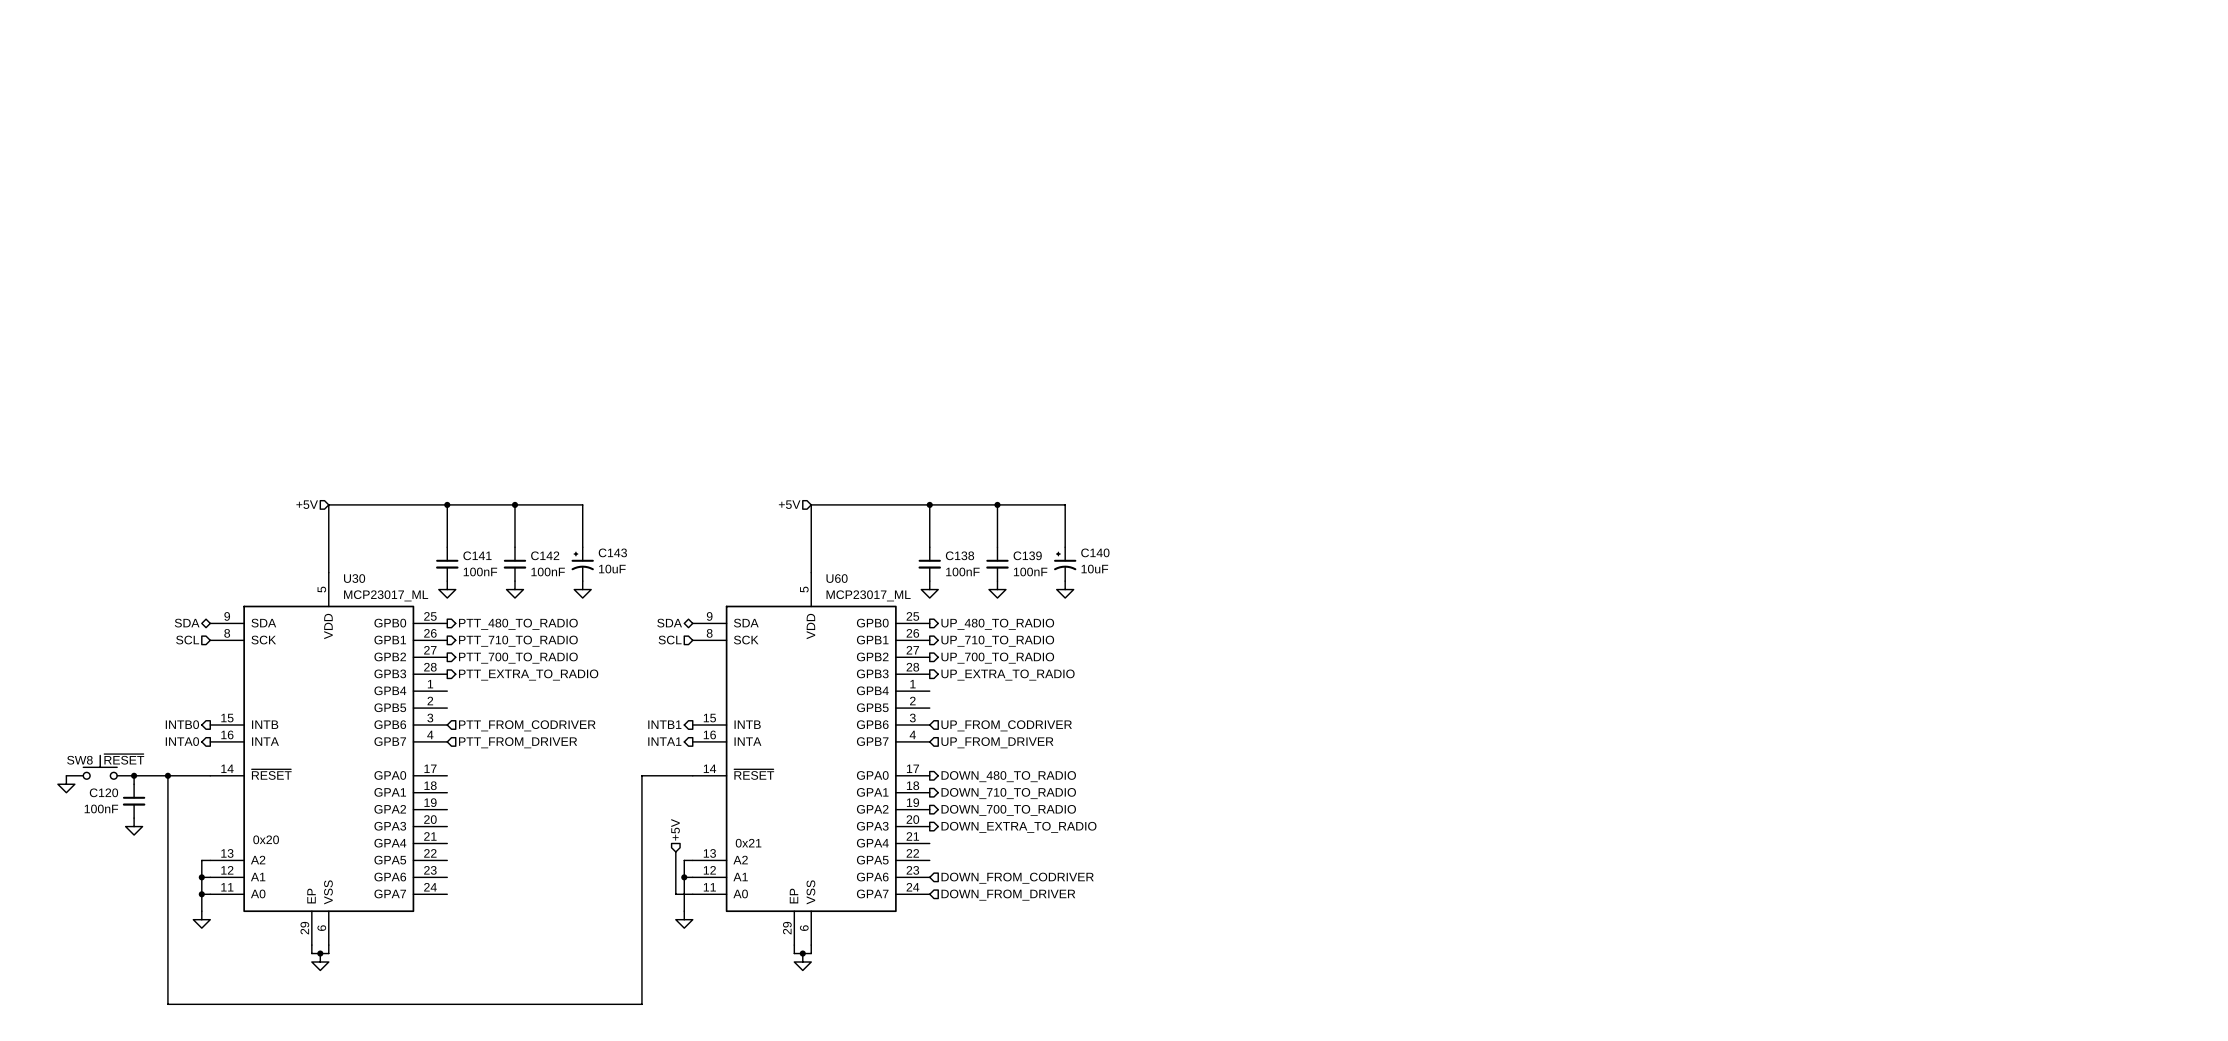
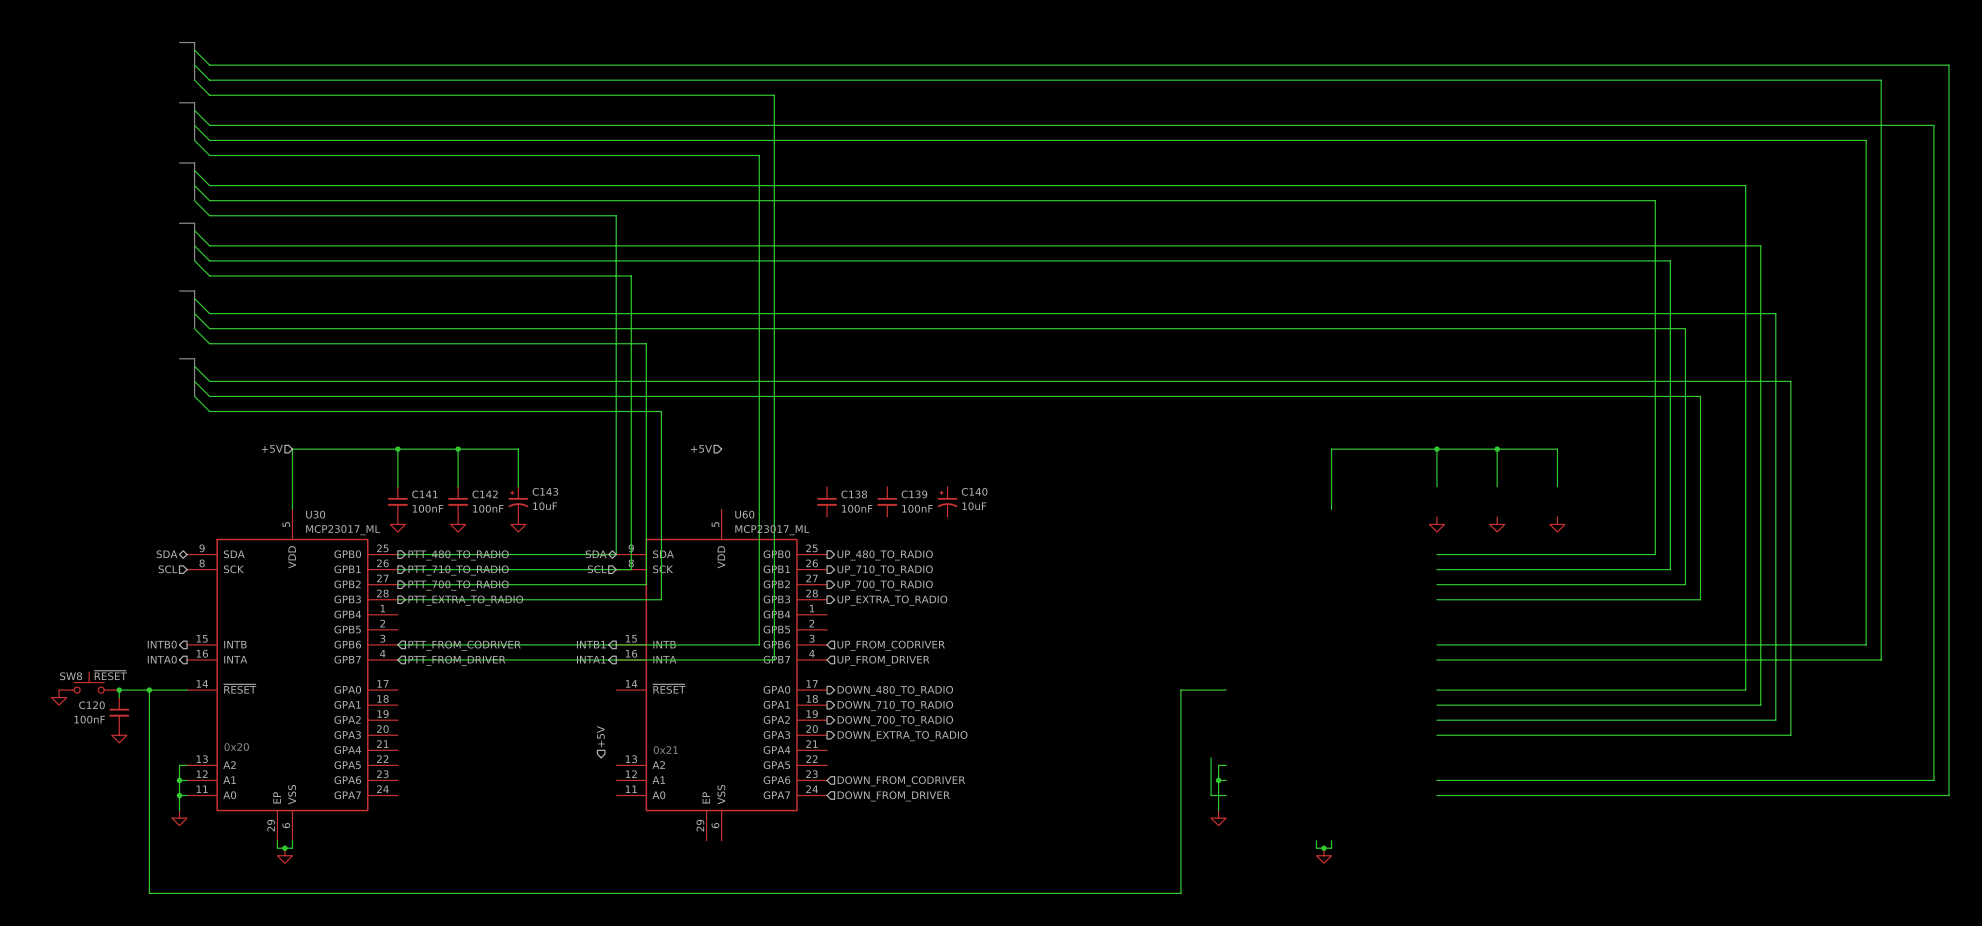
bus: none -> (179, 42) (194, 42) (194, 80)
wire: none -> (194, 50) (209, 65) (1948, 65) (1948, 795) (1436, 795)
wire: none -> (194, 65) (209, 80) (1881, 80) (1881, 659) (1436, 659)
wire: none -> (194, 80) (209, 95) (774, 95) (774, 659) (397, 659)
bus: none -> (179, 102) (194, 102) (194, 140)
wire: none -> (194, 110) (209, 125) (1933, 125) (1933, 780) (1436, 780)
wire: none -> (194, 125) (209, 140) (1866, 140) (1866, 644) (1436, 644)
wire: none -> (194, 140) (209, 155) (759, 155) (759, 644) (397, 644)
bus: none -> (179, 163) (194, 163) (194, 200)
wire: none -> (194, 170) (209, 185) (1745, 185) (1745, 690) (1436, 690)
wire: none -> (194, 185) (209, 200) (1655, 200) (1655, 554) (1436, 554)
wire: none -> (194, 200) (209, 215) (616, 215) (616, 554) (397, 554)
bus: none -> (179, 223) (194, 223) (194, 260)
wire: none -> (194, 230) (209, 245) (1760, 245) (1760, 705) (1436, 705)
wire: none -> (194, 245) (209, 260) (1670, 260) (1670, 569) (1436, 569)
wire: none -> (194, 260) (209, 275) (631, 275) (631, 569) (397, 569)
bus: none -> (179, 291) (194, 291) (194, 328)
wire: none -> (194, 298) (209, 313) (1775, 313) (1775, 720) (1436, 720)
wire: none -> (194, 313) (209, 328) (1685, 328) (1685, 584) (1436, 584)
wire: none -> (194, 328) (209, 343) (646, 343) (646, 584) (397, 584)
bus: none -> (179, 358) (194, 358) (194, 396)
wire: none -> (194, 366) (209, 381) (1790, 381) (1790, 735) (1436, 735)
wire: none -> (194, 381) (209, 396) (1700, 396) (1700, 599) (1436, 599)
wire: none -> (194, 396) (209, 411) (661, 411) (661, 599) (397, 599)
wire: (929, 504) (929, 547) -> none
junction: (929, 504) -> none
wire: (997, 504) (997, 547) -> none
junction: (997, 504) -> none
wire: none -> (1436, 449) (1436, 486)
junction: none -> (1436, 449)
wire: none -> (1497, 449) (1497, 486)
junction: none -> (1497, 449)
wire: (1065, 547) (1065, 504) (811, 504) (811, 572) -> none
wire: none -> (1557, 486) (1557, 449) (1331, 449) (1331, 509)
power symbol: (929, 589) -> none
power symbol: (997, 589) -> none
power symbol: (1065, 589) -> none
power symbol: none -> (1436, 524)
power symbol: none -> (1497, 524)
power symbol: none -> (1557, 524)
wire: (692, 775) (641, 775) (641, 1004) -> (1226, 690) (1180, 690) (1180, 893) (571, 893)
wire: (675, 851) (675, 894) (692, 894) -> none
wire: none -> (1211, 757) (1211, 795) (1226, 795)
wire: (692, 860) (684, 860) (684, 911) -> none
wire: none -> (1226, 765) (1218, 765) (1218, 810)
wire: (684, 877) (692, 877) -> none
junction: (684, 877) -> none
wire: none -> (1218, 780) (1226, 780)
junction: none -> (1218, 780)
power symbol: (684, 919) -> none
power symbol: none -> (1218, 818)
wire: (794, 945) (794, 953) (811, 953) (811, 945) -> none
wire: none -> (1316, 840) (1316, 848) (1331, 848) (1331, 840)
junction: (802, 953) -> none
junction: none -> (1324, 848)
power symbol: (802, 962) -> none
power symbol: none -> (1324, 855)

